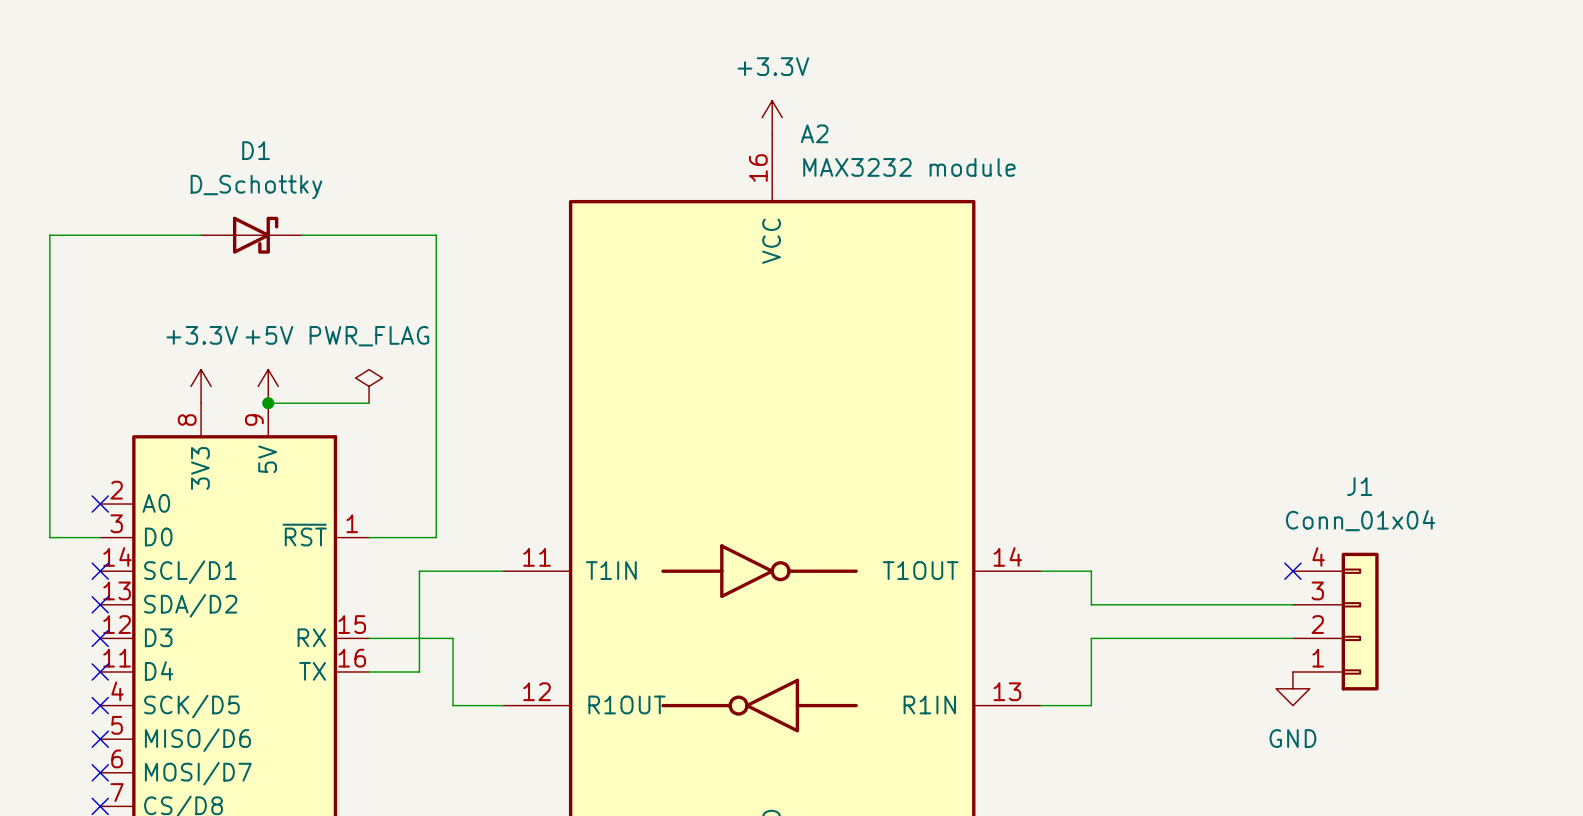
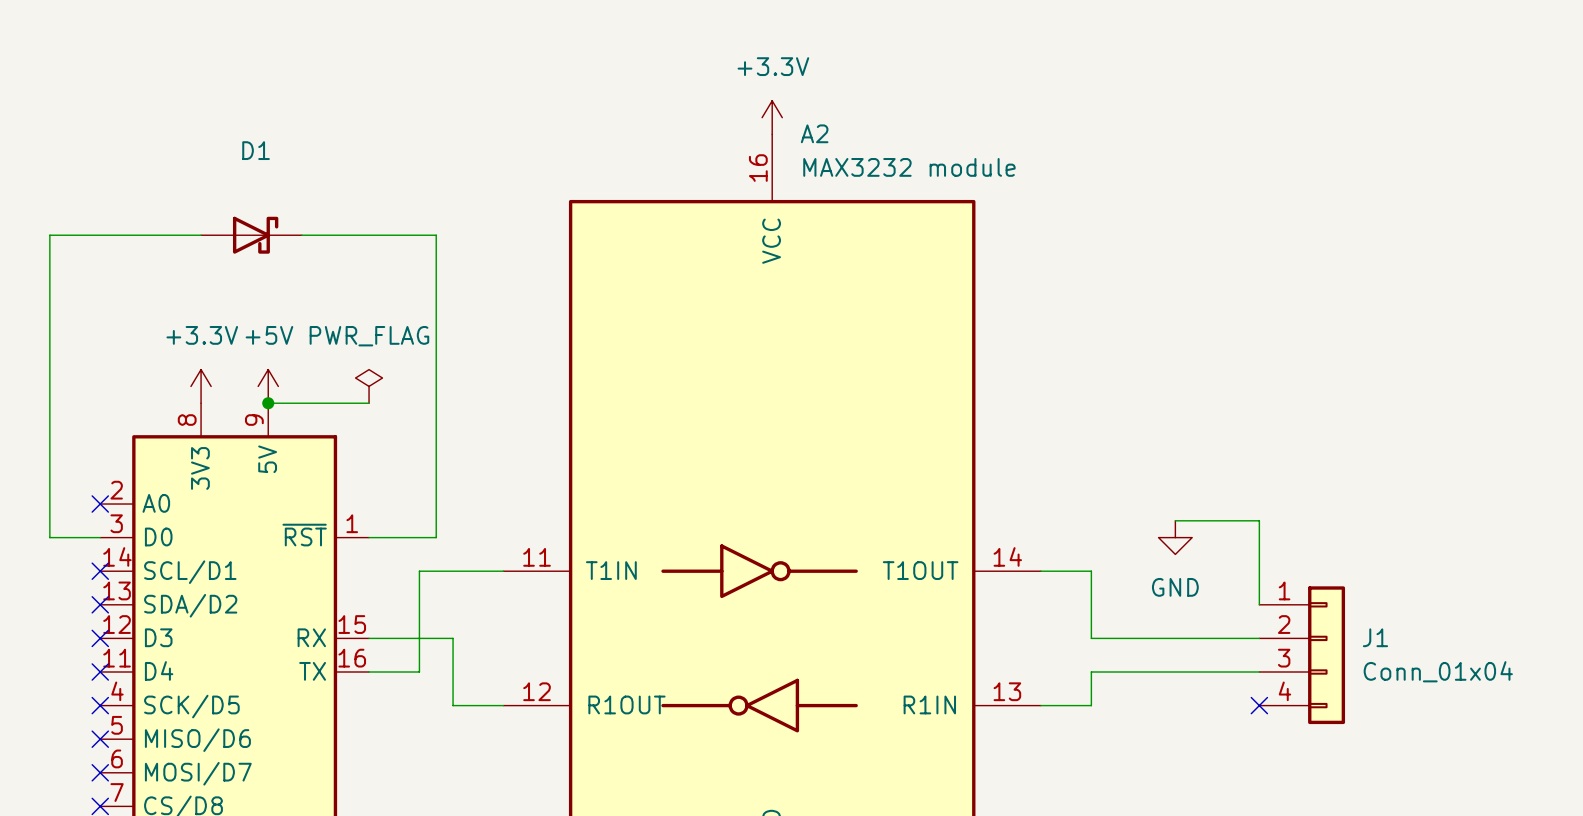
D1 value: D_Schottky (256, 187) -> none
J1 name position: J1 (1359, 486) -> J1 (1375, 637)
wire: none -> (1175, 520) (1259, 520) (1259, 604)
J1 value position: Conn_01x04 (1360, 520) -> Conn_01x04 (1438, 671)
no-connect mark: (1292, 571) -> none
wire: (1091, 604) (1292, 604) -> none
J1 flip: as is (1360, 621) -> up-down (1326, 655)
wire: (1091, 638) (1091, 672) -> (1091, 638) (1091, 604)
wire: none -> (1091, 672) (1259, 672)
power symbol position: GND (1292, 688) -> GND (1175, 537)
no-connect mark: none -> (1259, 705)

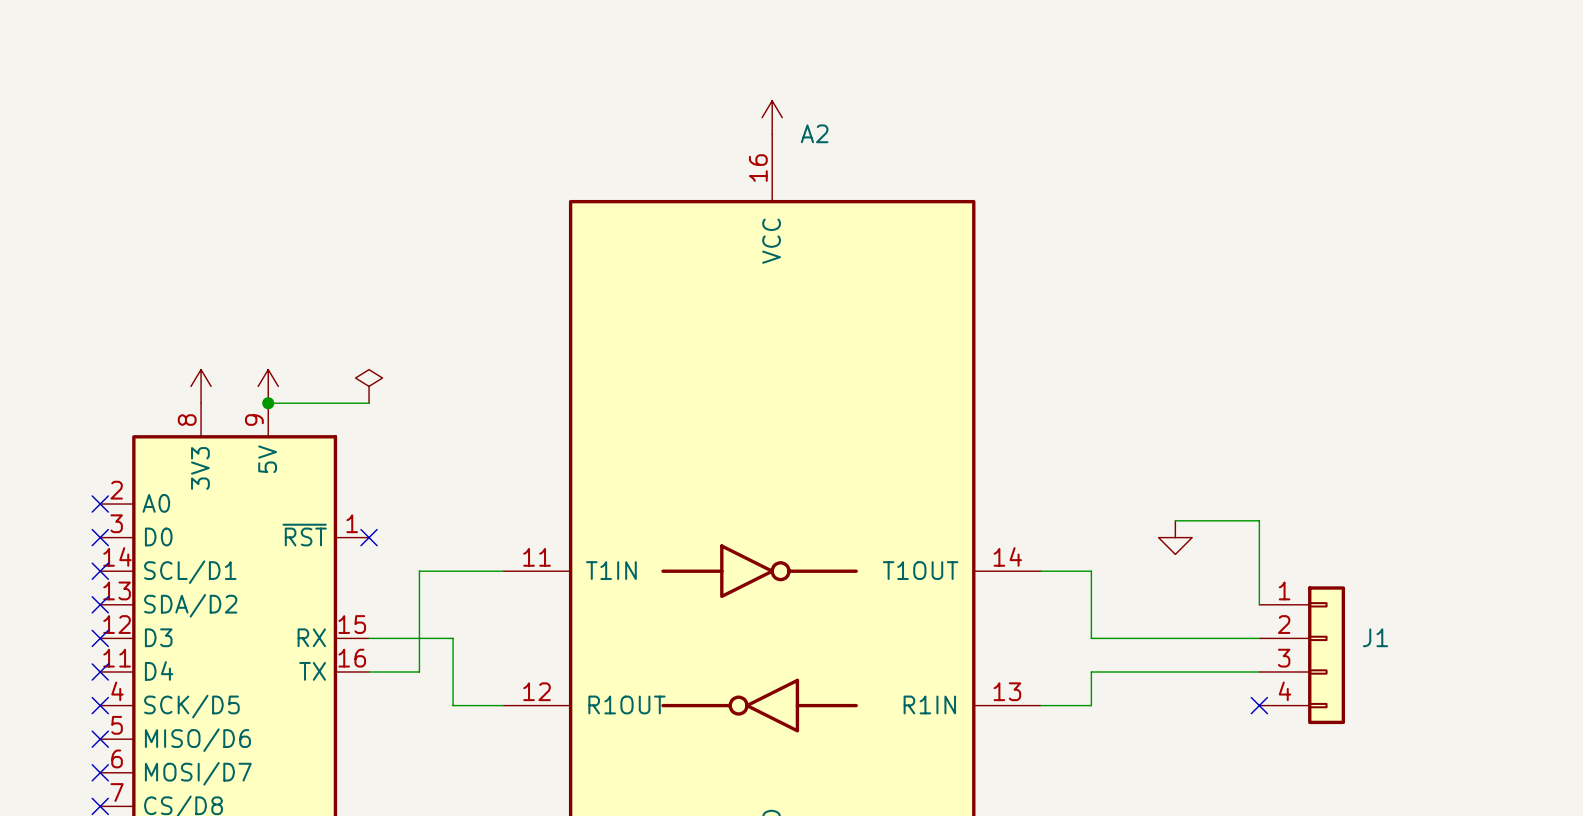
power symbol text: +3.3V (773, 66) -> none
A2 value: MAX3232 module (909, 167) -> none
wire: (201, 235) (49, 235) (49, 537) (100, 537) -> none
D1: (251, 235) -> none
wire: (301, 235) (436, 235) (436, 537) (369, 537) -> none
power symbol text: +3.3V (202, 335) -> none
power symbol text: +5V (269, 335) -> none
power symbol text: PWR_FLAG (369, 336) -> none
no-connect mark: none -> (100, 537)
no-connect mark: none -> (369, 537)
power symbol text: GND (1175, 587) -> none
J1 value: Conn_01x04 (1438, 671) -> none

